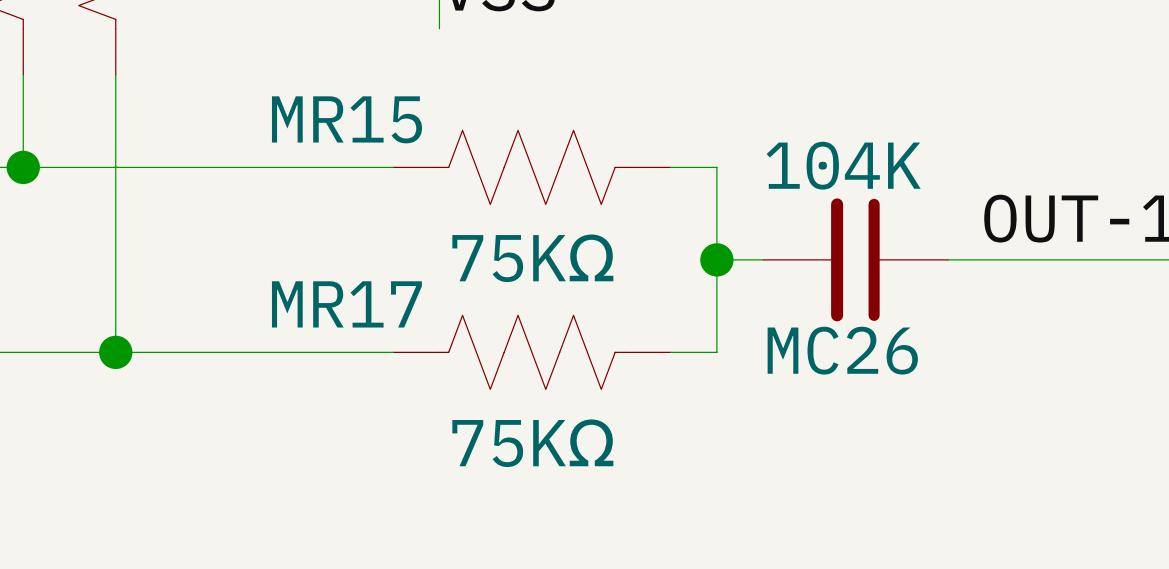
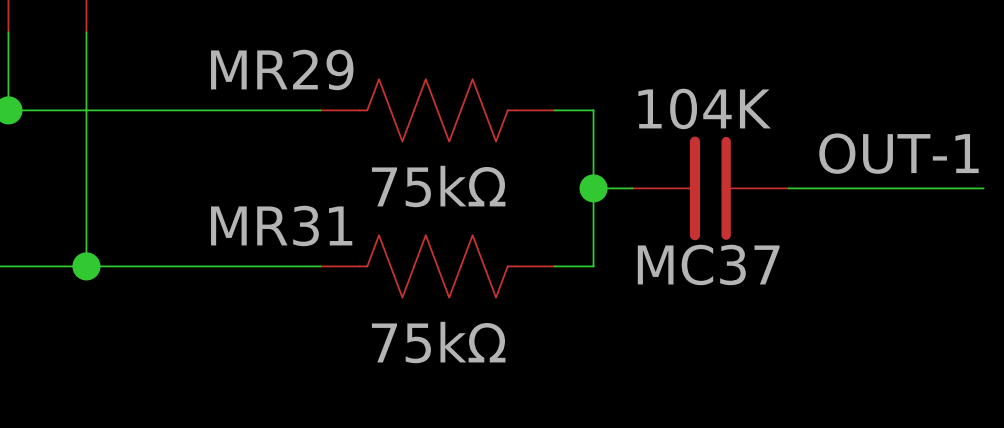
MR15 name: MR15 (346, 119) -> MR29 (282, 69)
MR15 value: 75KΩ (532, 258) -> 75kΩ (438, 186)
MR17 name: MR17 (346, 304) -> MR31 (281, 225)
MC26 name: MC26 (842, 350) -> MC37 (708, 264)
MR17 value: 75KΩ (532, 443) -> 75kΩ (438, 342)

